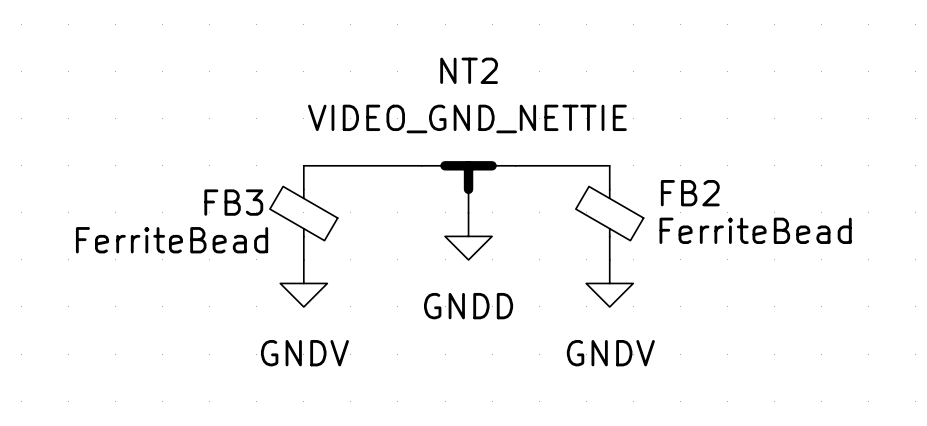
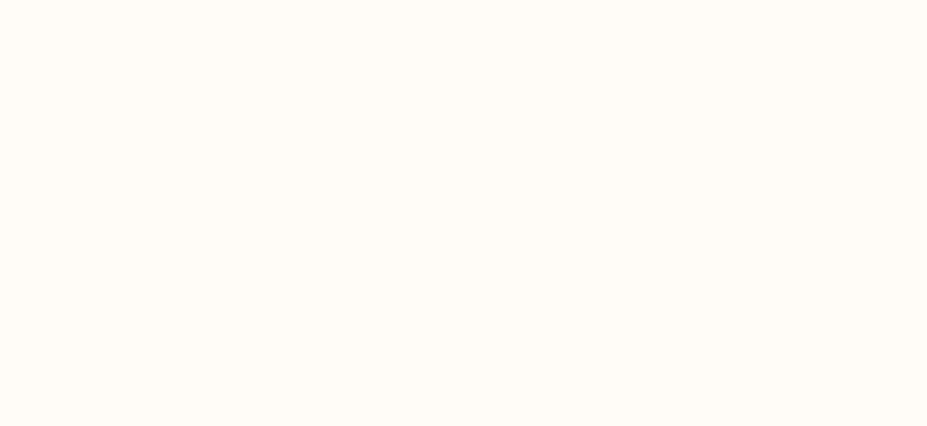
wire: (303, 165) (421, 165) -> none
wire: (515, 165) (609, 165) -> none
NT2: VIDEO_GND_NETTIE (468, 188) -> none
FB3: FerriteBead (303, 212) -> none
FB2: FerriteBead (609, 212) -> none
power symbol: GNDD (468, 236) -> none
power symbol: GNDV (303, 283) -> none
power symbol: GNDV (609, 283) -> none

